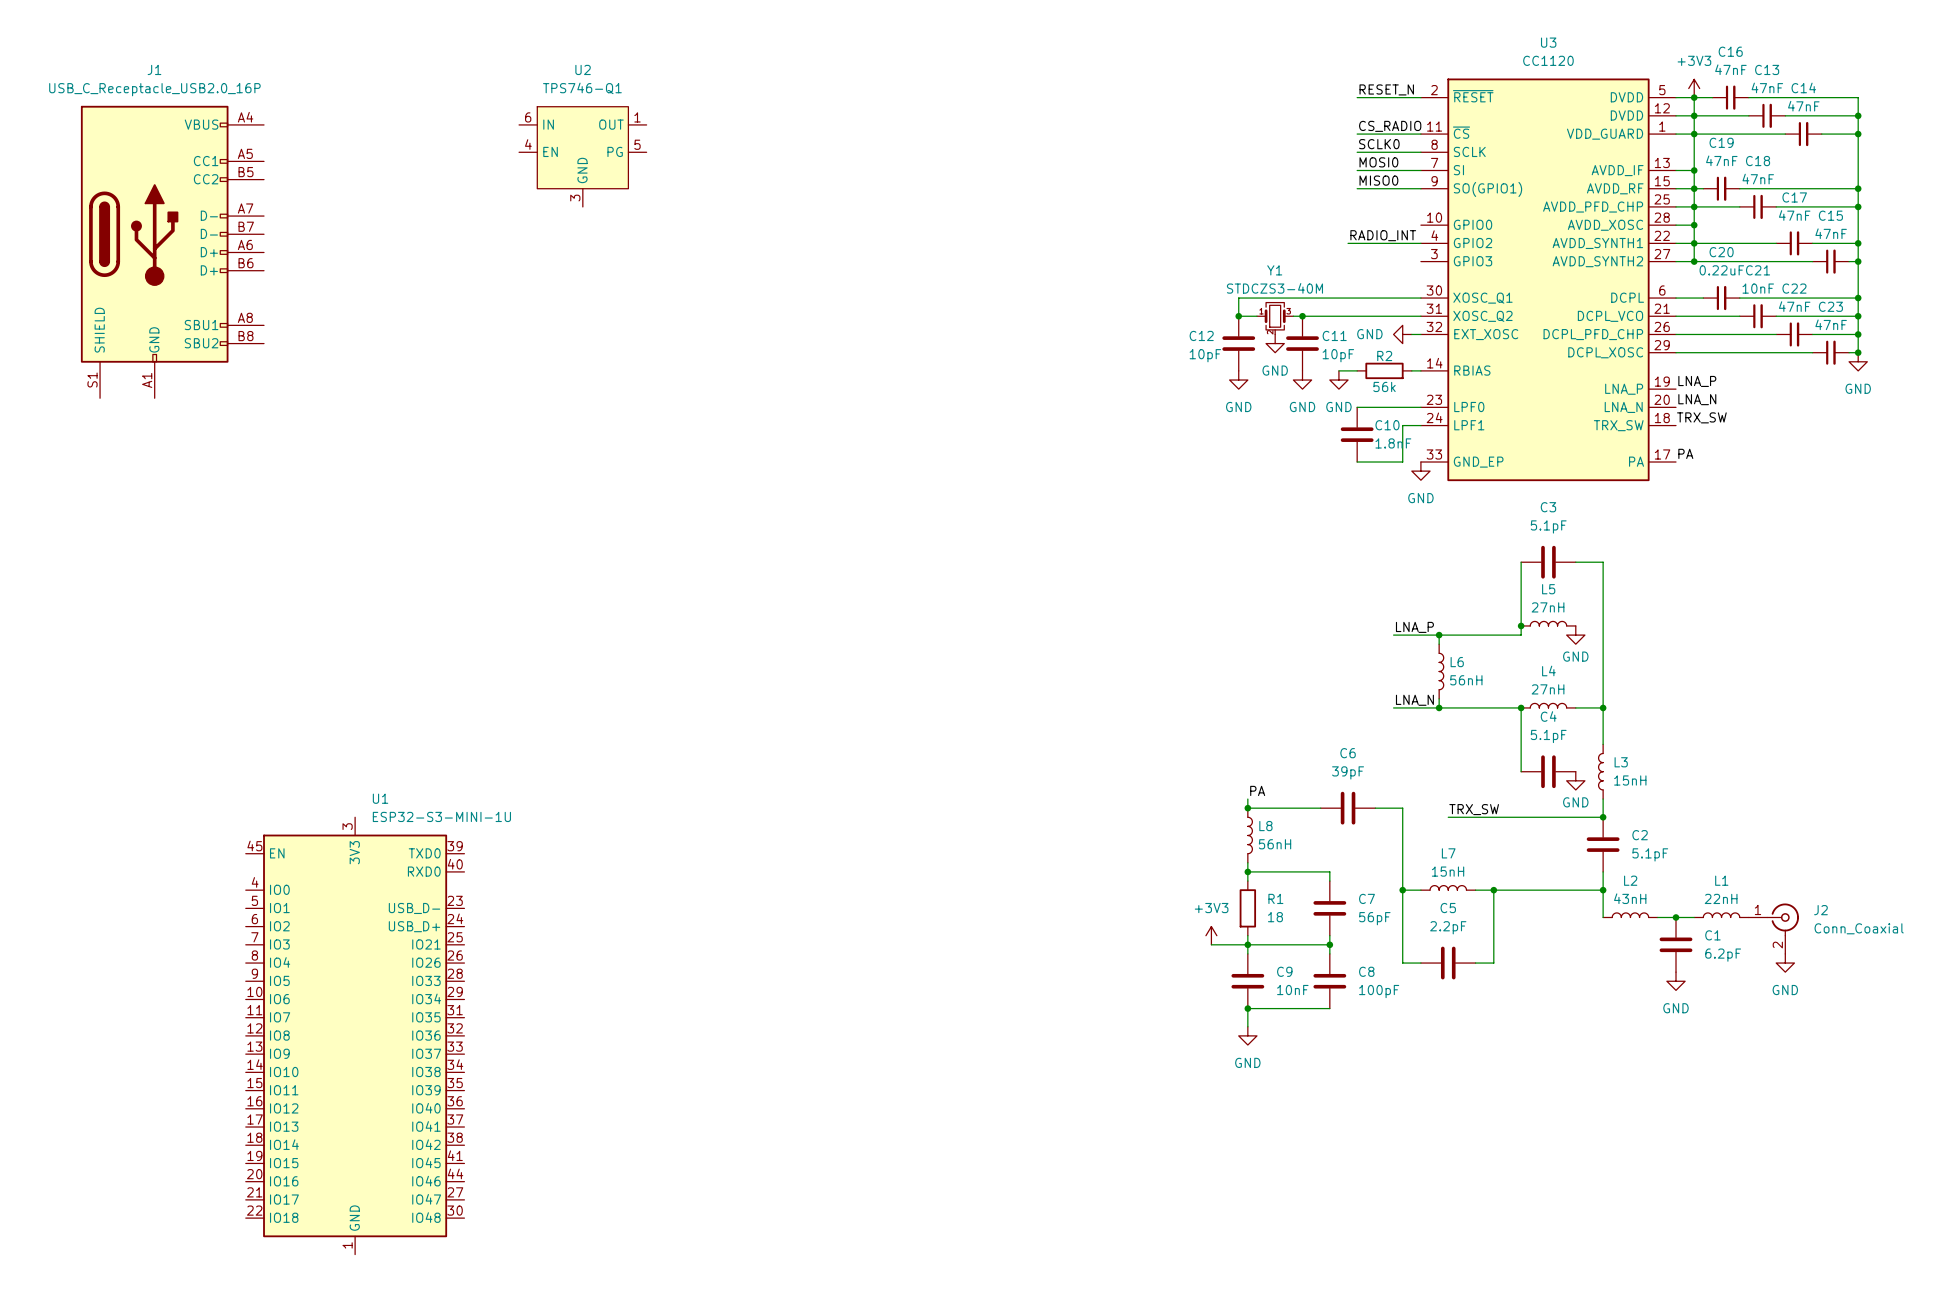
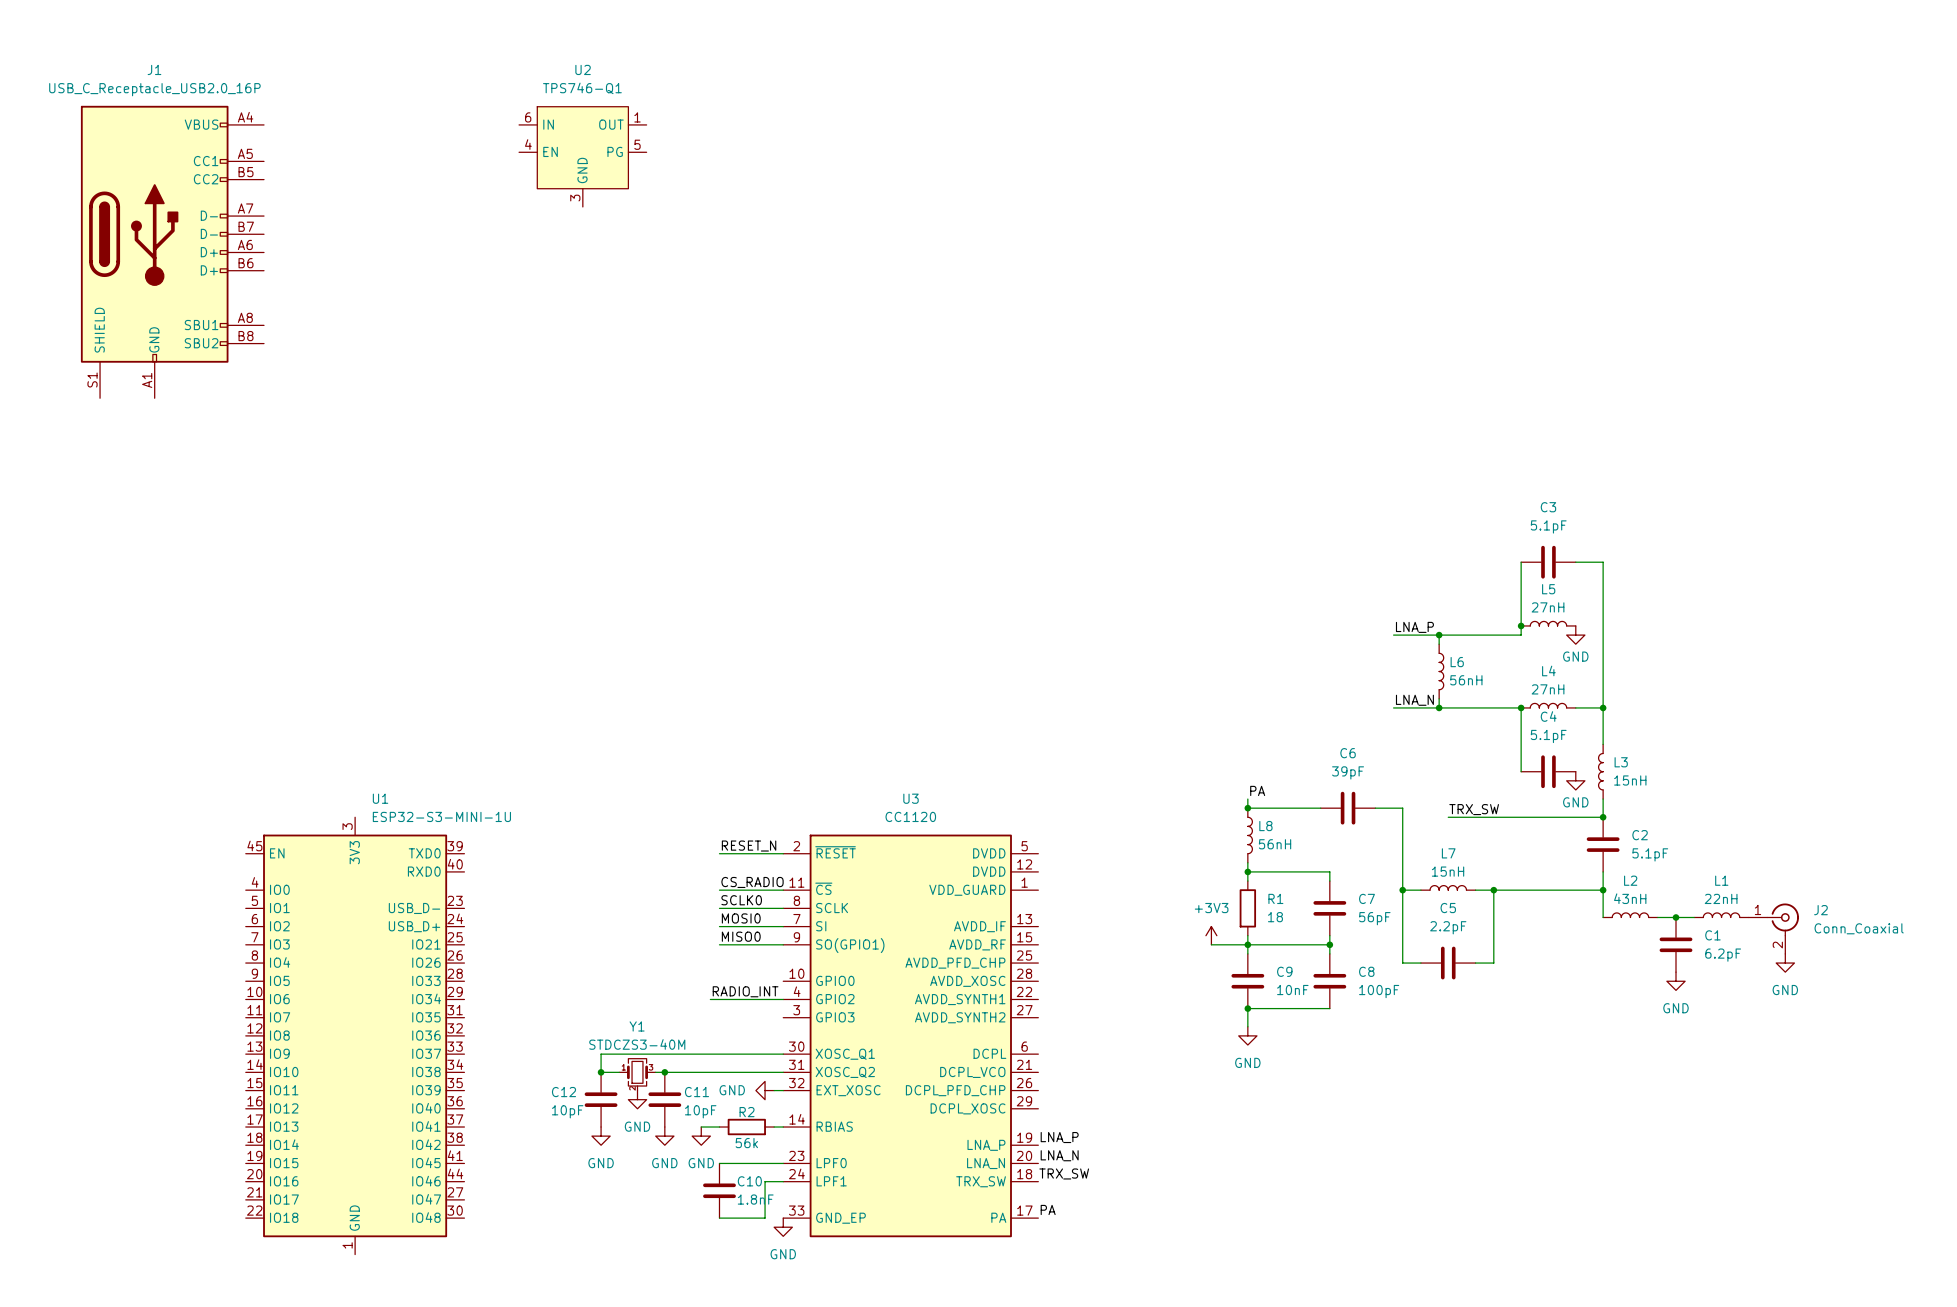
power symbol: +3V3 (1694, 88) -> none
label: RESET_N (1386, 89) -> none
wire: (1357, 97) (1420, 97) -> none
wire: (1676, 97) (1712, 97) -> none
wire: (1694, 97) (1694, 261) -> none
junction: (1694, 97) -> none
C16: 47nF (1730, 97) -> none
wire: (1748, 97) (1858, 97) (1858, 352) (1849, 352) -> none
wire: (1676, 115) (1748, 115) -> none
junction: (1694, 115) -> none
C13: 47nF (1767, 115) -> none
wire: (1785, 115) (1858, 115) -> none
junction: (1858, 115) -> none
label: CS_RADIO (1390, 126) -> none
wire: (1357, 134) (1420, 134) -> none
wire: (1676, 134) (1785, 134) -> none
junction: (1694, 134) -> none
C14: 47nF (1803, 134) -> none
wire: (1821, 134) (1858, 134) -> none
junction: (1858, 134) -> none
label: SCLK0 (1379, 144) -> none
wire: (1357, 152) (1420, 152) -> none
label: MOSI0 (1378, 162) -> none
wire: (1357, 170) (1420, 170) -> none
wire: (1676, 170) (1694, 170) -> none
junction: (1694, 170) -> none
label: MISO0 (1378, 180) -> none
wire: (1357, 188) (1420, 188) -> none
wire: (1676, 188) (1703, 188) -> none
junction: (1694, 188) -> none
C19: 47nF (1721, 188) -> none
wire: (1739, 188) (1858, 188) -> none
junction: (1858, 188) -> none
wire: (1676, 206) (1739, 206) -> none
junction: (1694, 206) -> none
C18: 47nF (1757, 206) -> none
wire: (1776, 206) (1858, 206) -> none
junction: (1858, 206) -> none
wire: (1676, 225) (1694, 225) -> none
junction: (1694, 225) -> none
label: RADIO_INT (1383, 235) -> none
wire: (1348, 243) (1420, 243) -> none
wire: (1676, 243) (1776, 243) -> none
junction: (1694, 243) -> none
C17: 47nF (1794, 243) -> none
wire: (1812, 243) (1858, 243) -> none
junction: (1858, 243) -> none
wire: (1676, 261) (1812, 261) -> none
junction: (1694, 261) -> none
C15: 47nF (1830, 261) -> none
wire: (1849, 261) (1858, 261) -> none
junction: (1858, 261) -> none
U3 position: (1548, 279) -> (910, 1035)
wire: (1420, 298) (1238, 298) (1238, 316) (1256, 316) -> none
wire: (1676, 298) (1703, 298) -> none
C20: 0.22uF (1721, 298) -> none
wire: (1739, 298) (1858, 298) -> none
junction: (1858, 298) -> none
junction: (1238, 316) -> none
wire: (1293, 316) (1420, 316) -> none
junction: (1302, 316) -> none
wire: (1676, 316) (1739, 316) -> none
C21: 10nF (1757, 316) -> none
wire: (1776, 316) (1858, 316) -> none
junction: (1858, 316) -> none
Y1 position: (1275, 318) -> (637, 1074)
power symbol: GND (1402, 334) -> none
wire: (1411, 334) (1420, 334) -> none
wire: (1676, 334) (1776, 334) -> none
C22: 47nF (1794, 334) -> none
wire: (1812, 334) (1858, 334) -> none
junction: (1858, 334) -> none
C12 position: (1238, 343) -> (601, 1099)
power symbol: GND (1275, 343) -> none
C11 position: (1302, 343) -> (664, 1099)
wire: (1676, 352) (1812, 352) -> none
C23: 47nF (1830, 352) -> none
junction: (1858, 352) -> none
power symbol: GND (1858, 361) -> none
wire: (1338, 370) (1357, 370) -> none
R2 position: (1384, 370) -> (746, 1127)
wire: (1411, 370) (1420, 370) -> none
power symbol: GND (1238, 380) -> none
power symbol: GND (1302, 380) -> none
power symbol: GND (1338, 380) -> none
label: LNA_P (1697, 381) -> none
label: LNA_N (1697, 399) -> none
wire: (1357, 407) (1420, 407) -> none
label: TRX_SW (1701, 417) -> none
wire: (1420, 425) (1402, 425) (1402, 462) (1357, 462) -> none
C10 position: (1357, 434) -> (719, 1190)
label: PA (1685, 453) -> none
power symbol: GND (1420, 471) -> none
label: none -> RESET_N (749, 846)
wire: none -> (719, 853) (783, 853)
label: none -> CS_RADIO (752, 882)
wire: none -> (719, 890) (783, 890)
label: none -> SCLK0 (741, 900)
wire: none -> (719, 908) (783, 908)
label: none -> MOSI0 (741, 918)
wire: none -> (719, 926) (783, 926)
label: none -> MISO0 (741, 936)
wire: none -> (719, 944) (783, 944)
label: none -> RADIO_INT (745, 991)
wire: none -> (710, 999) (783, 999)
wire: none -> (783, 1054) (601, 1054) (601, 1072) (619, 1072)
junction: none -> (601, 1072)
wire: none -> (655, 1072) (783, 1072)
junction: none -> (664, 1072)
power symbol: none -> GND (765, 1090)
wire: none -> (774, 1090) (783, 1090)
power symbol: none -> GND (637, 1099)
wire: none -> (701, 1127) (719, 1127)
wire: none -> (774, 1127) (783, 1127)
power symbol: none -> GND (601, 1136)
power symbol: none -> GND (664, 1136)
power symbol: none -> GND (701, 1136)
label: none -> LNA_P (1059, 1137)
label: none -> LNA_N (1059, 1155)
wire: none -> (719, 1163) (783, 1163)
label: none -> TRX_SW (1064, 1173)
wire: none -> (783, 1181) (765, 1181) (765, 1218) (719, 1218)
label: none -> PA (1048, 1209)
power symbol: none -> GND (783, 1227)

